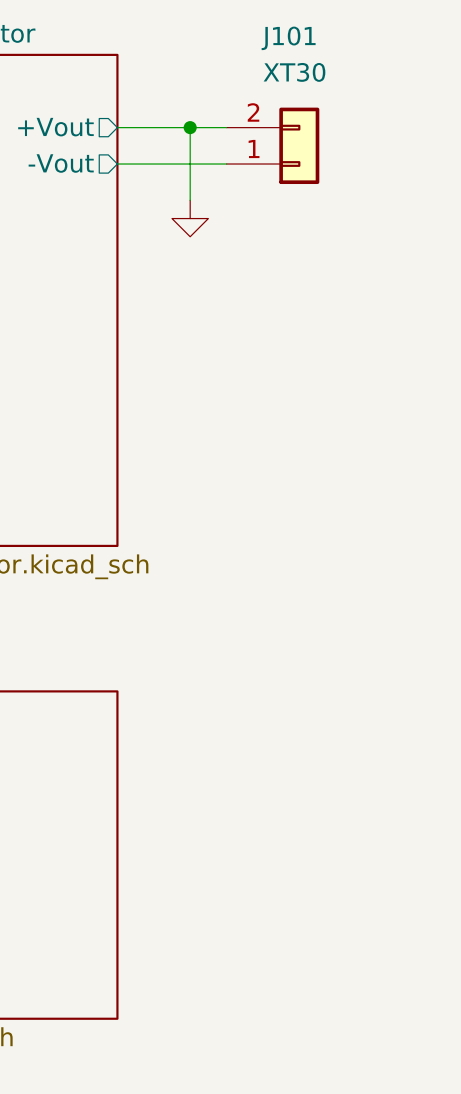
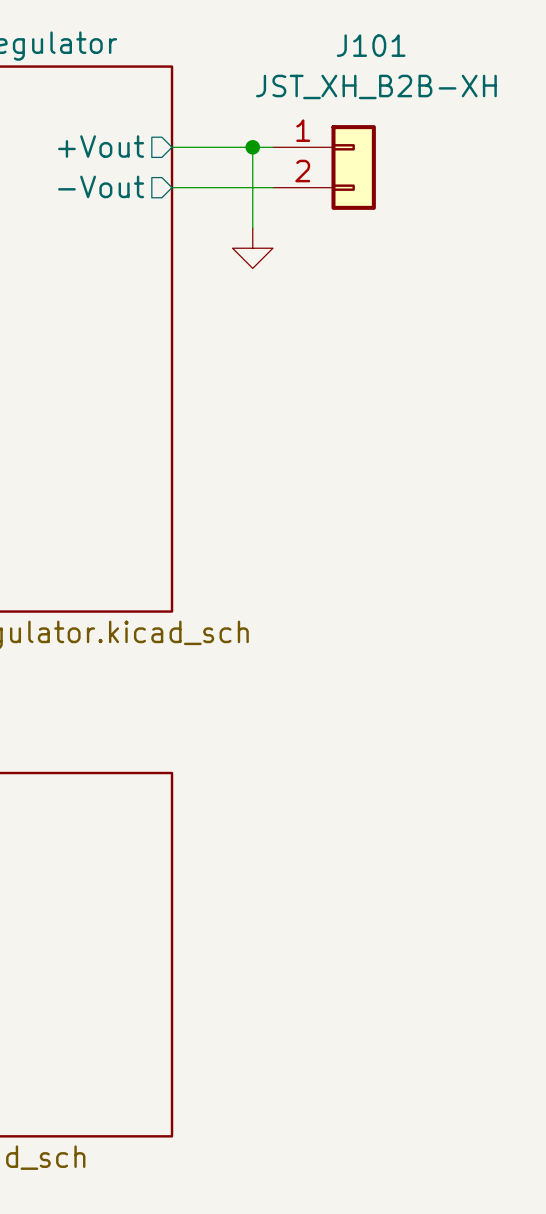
J101 value: XT30 (294, 72) -> JST_XH_B2B-XH (376, 86)
J101 flip: as is (299, 145) -> up-down (353, 167)

